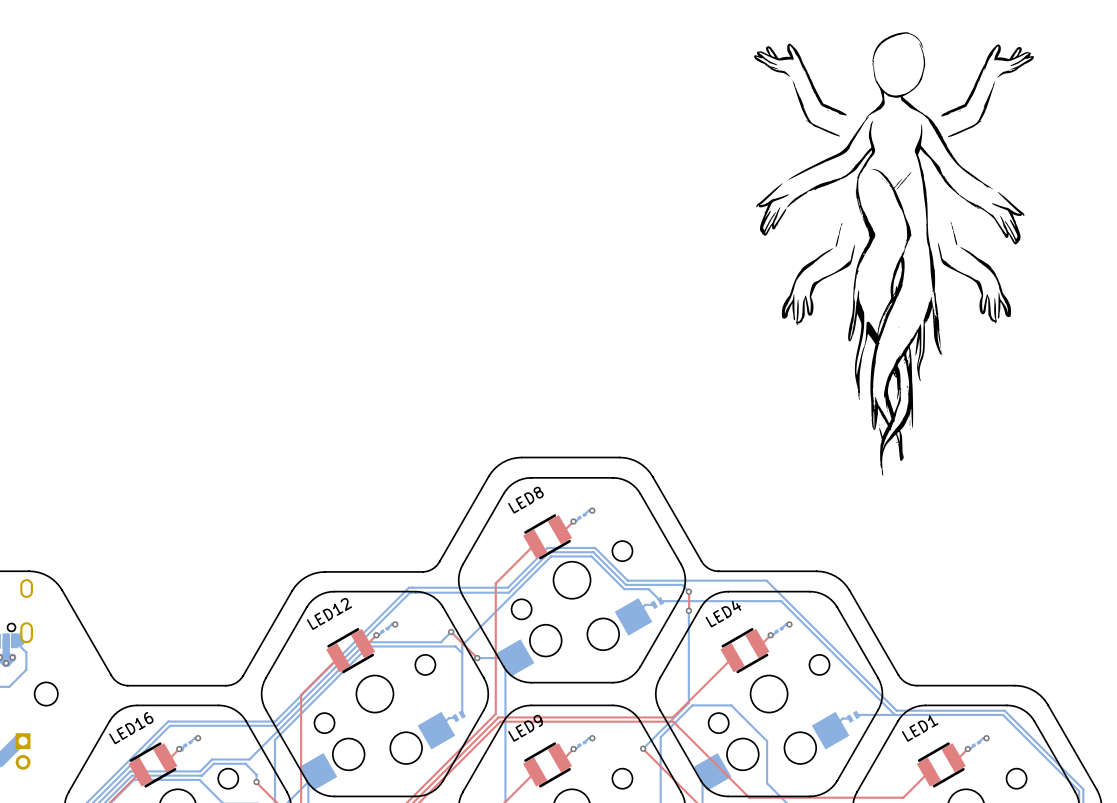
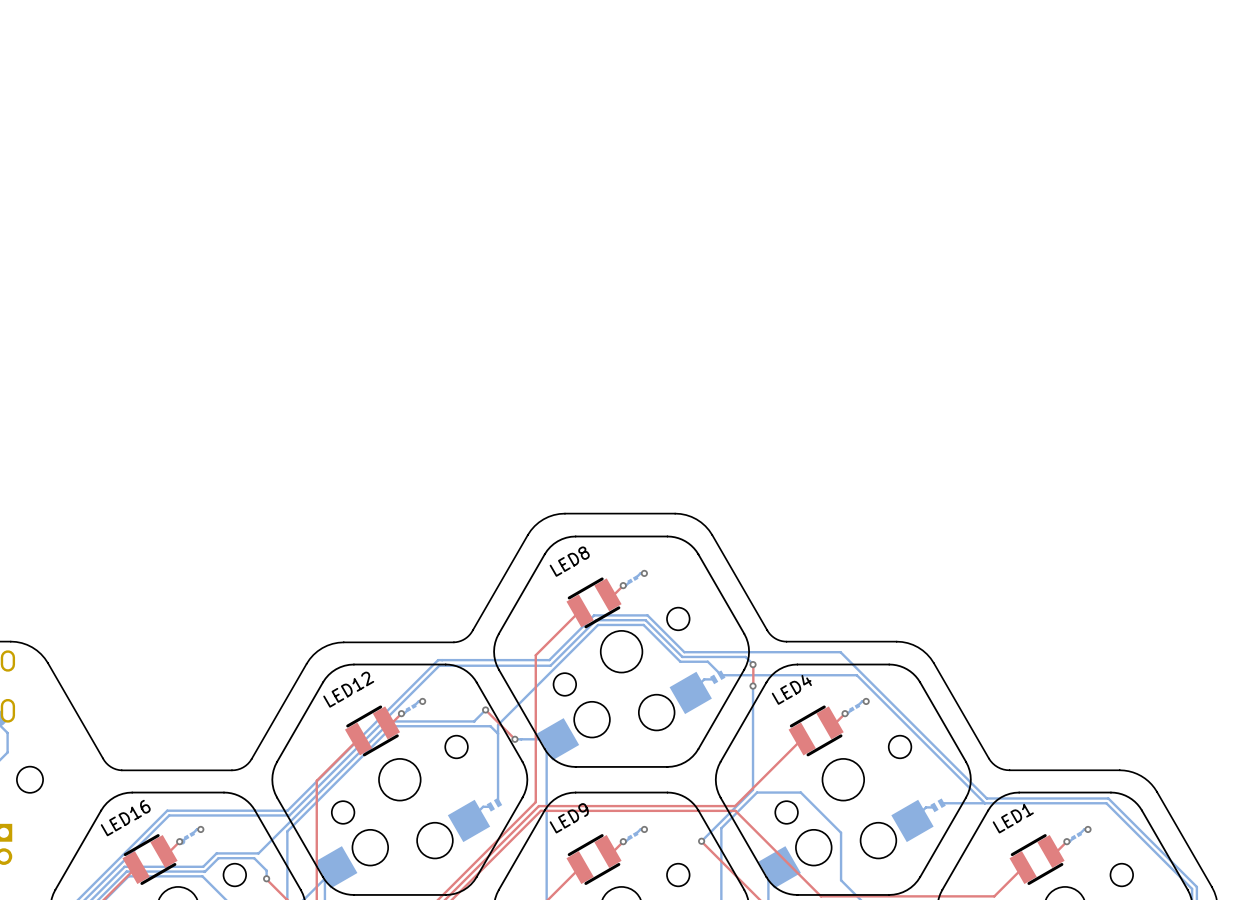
drawing: [754, 32, 1034, 476] -> none

